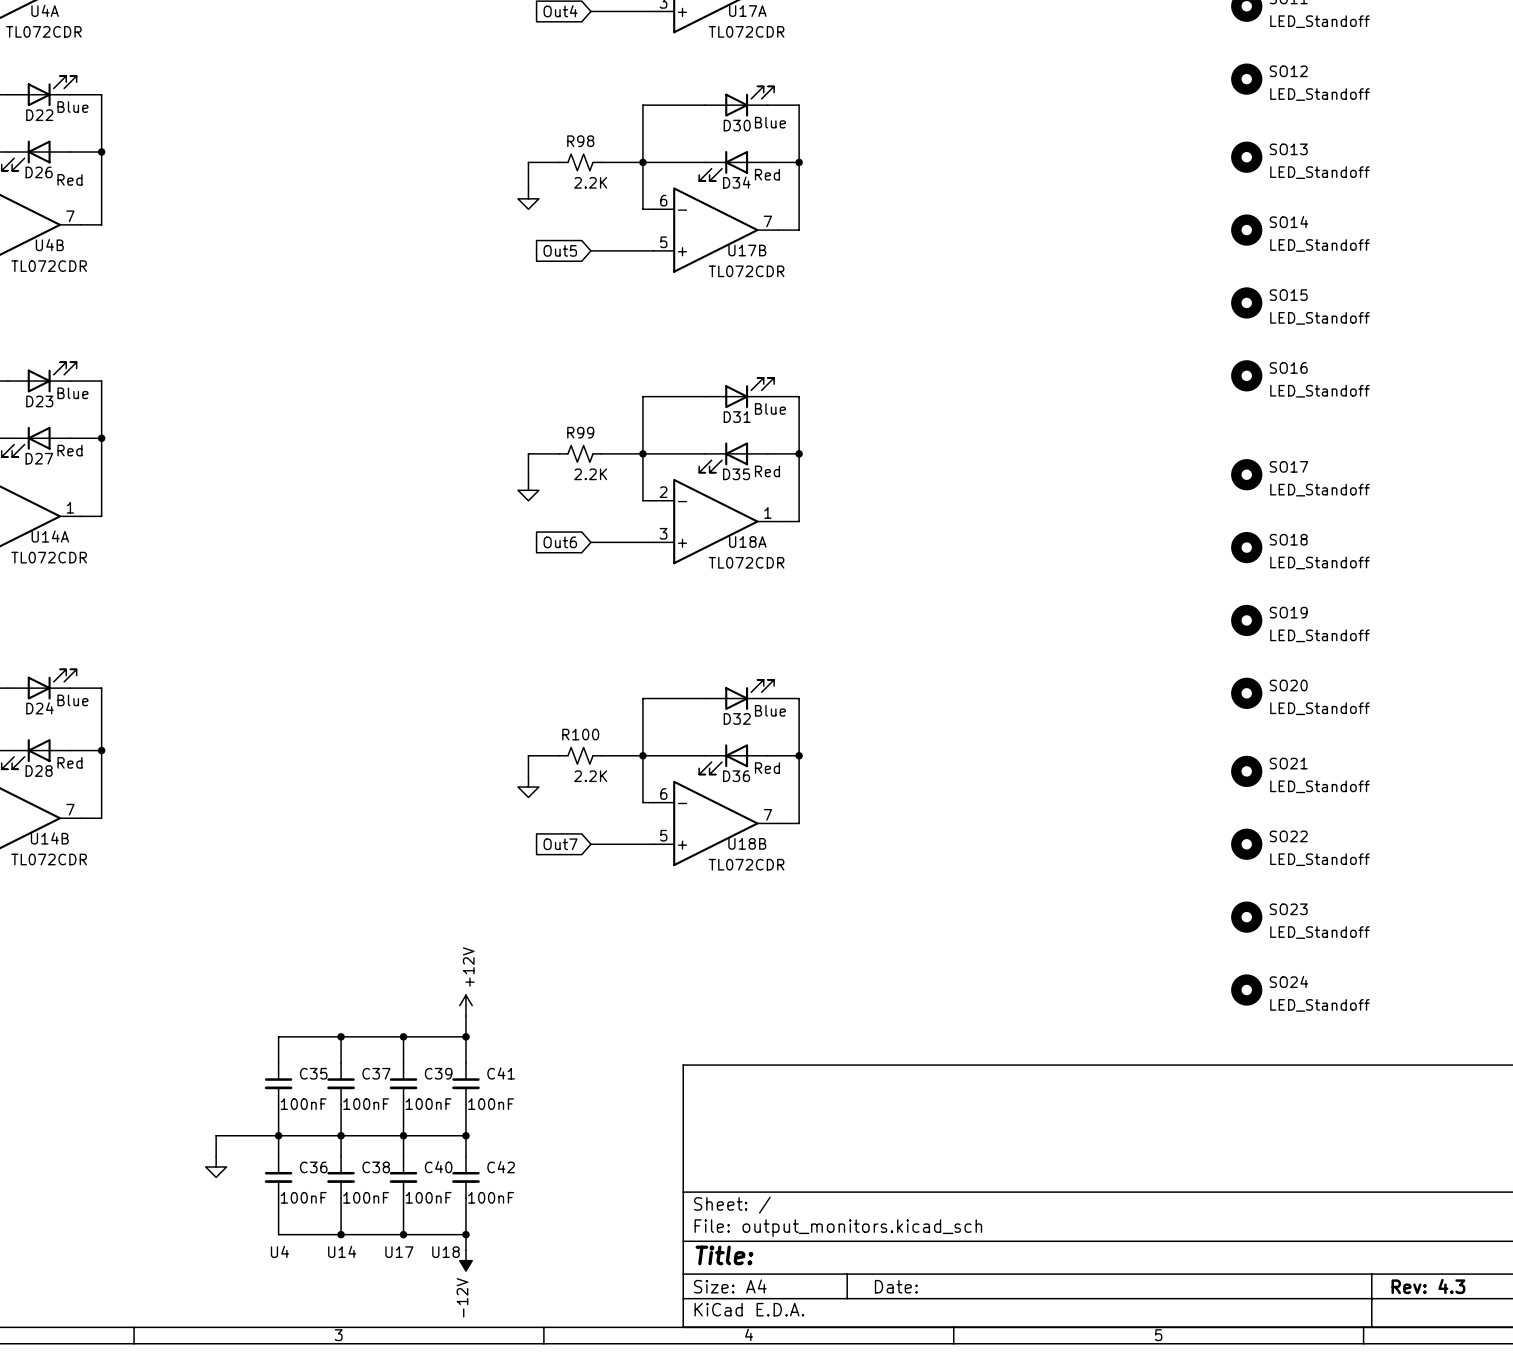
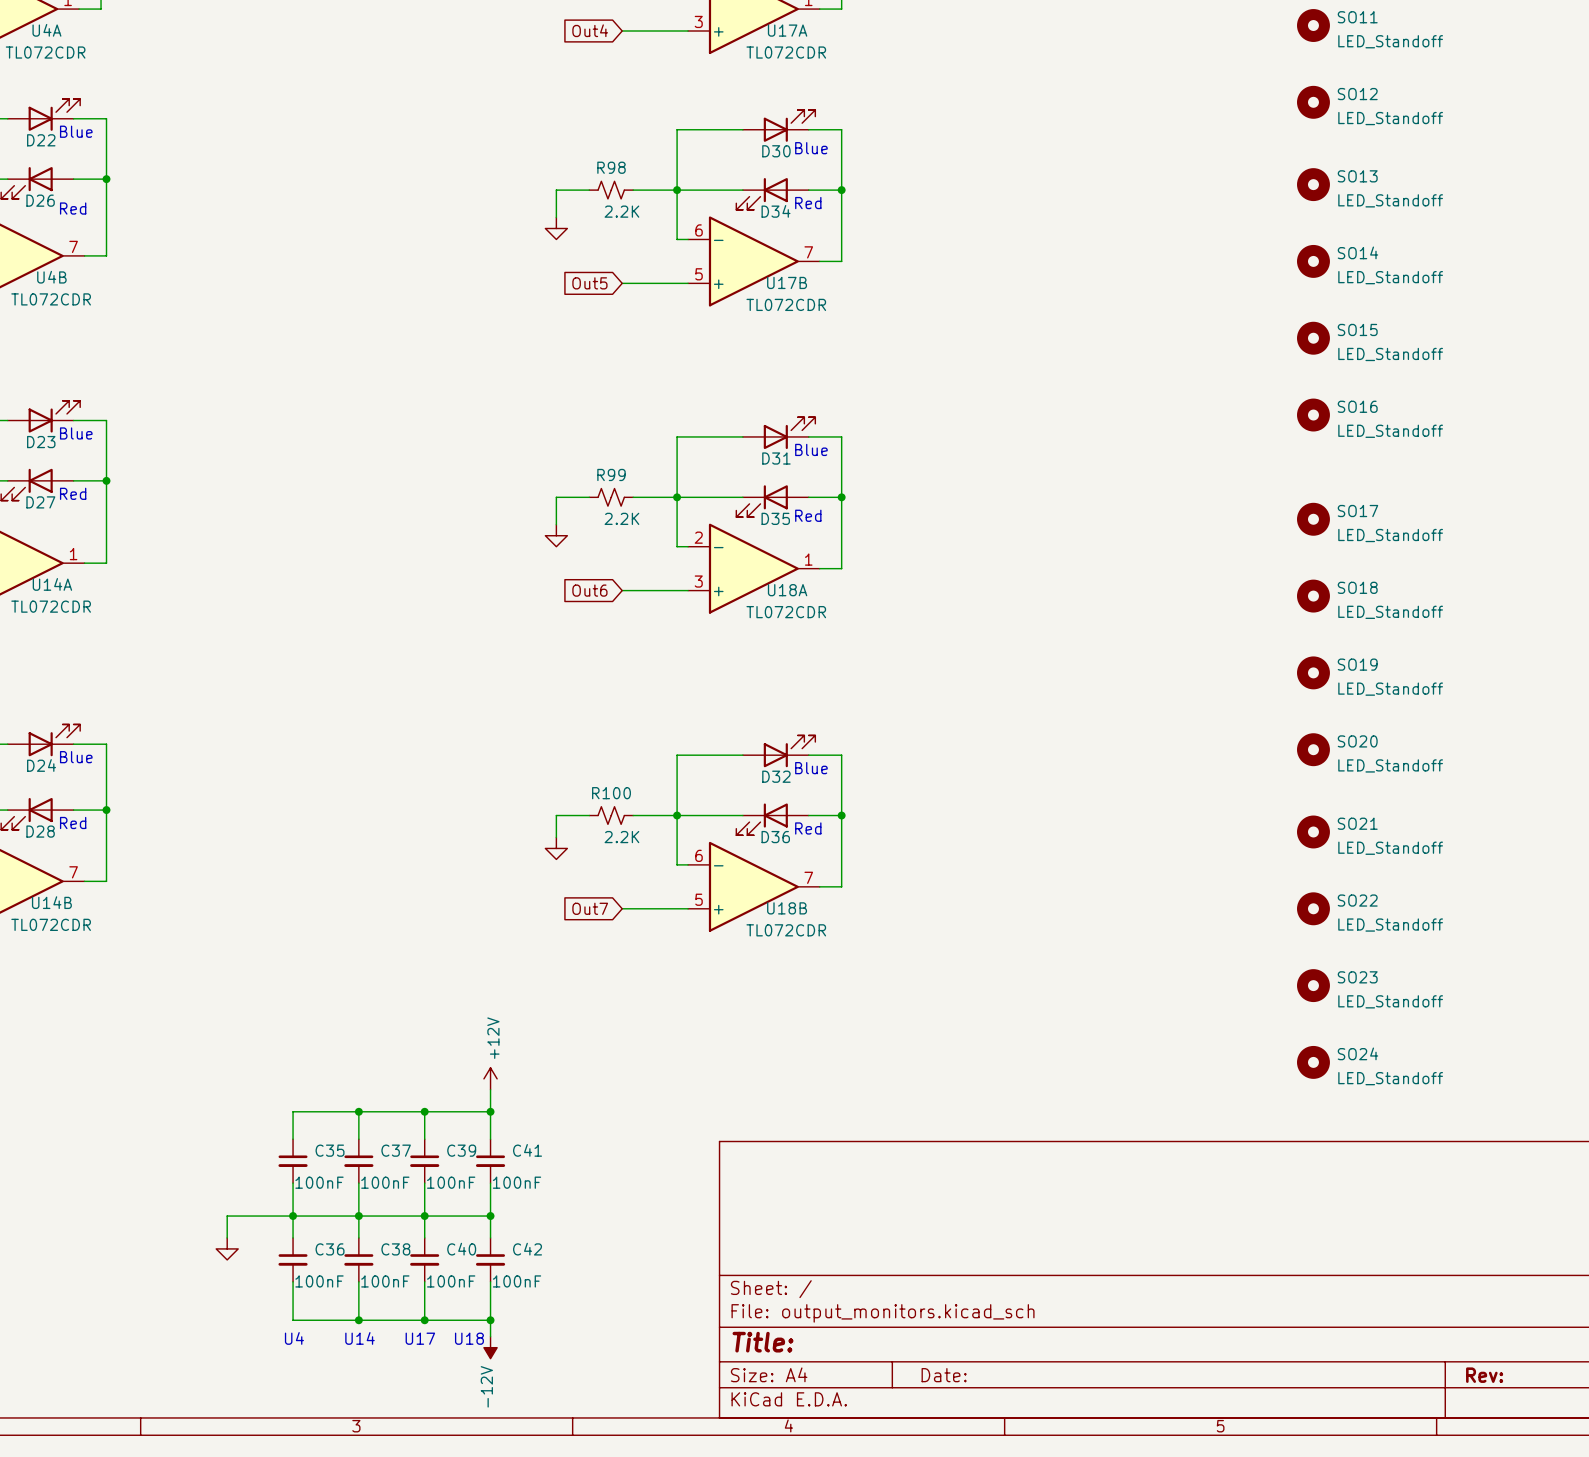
title block: Rev: 4.3 (1428, 1286) -> Rev: (1484, 1375)

